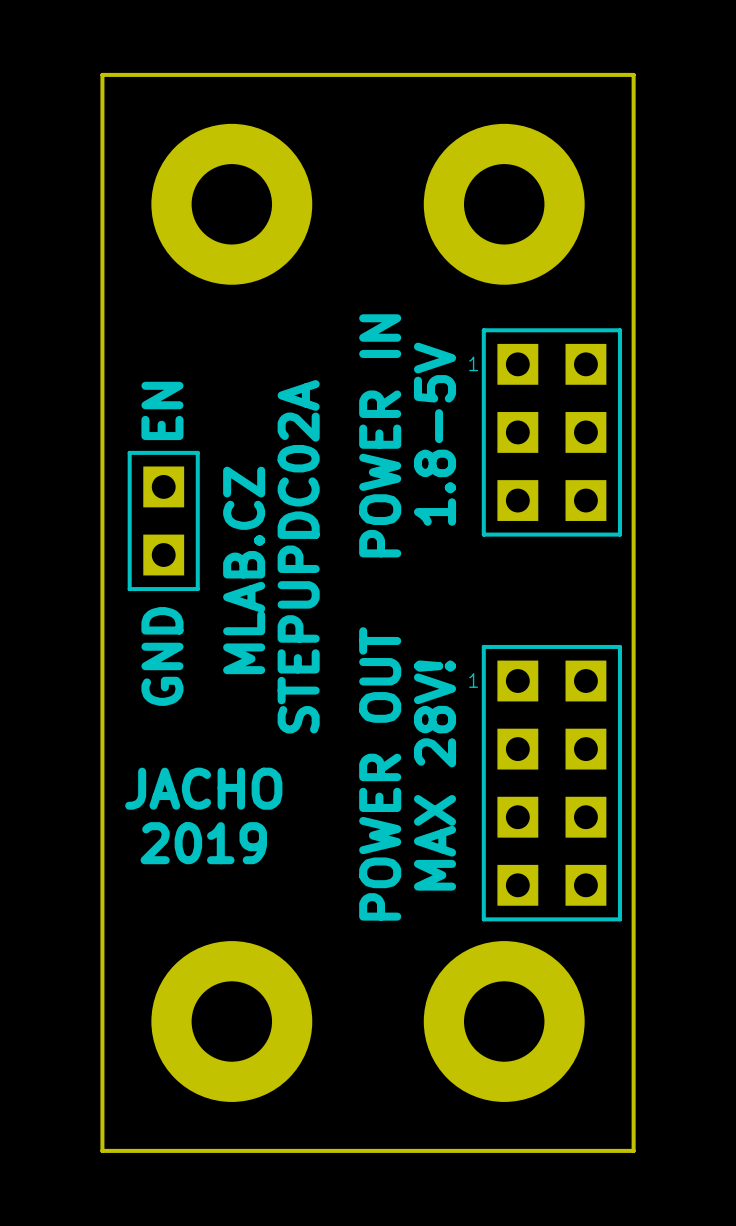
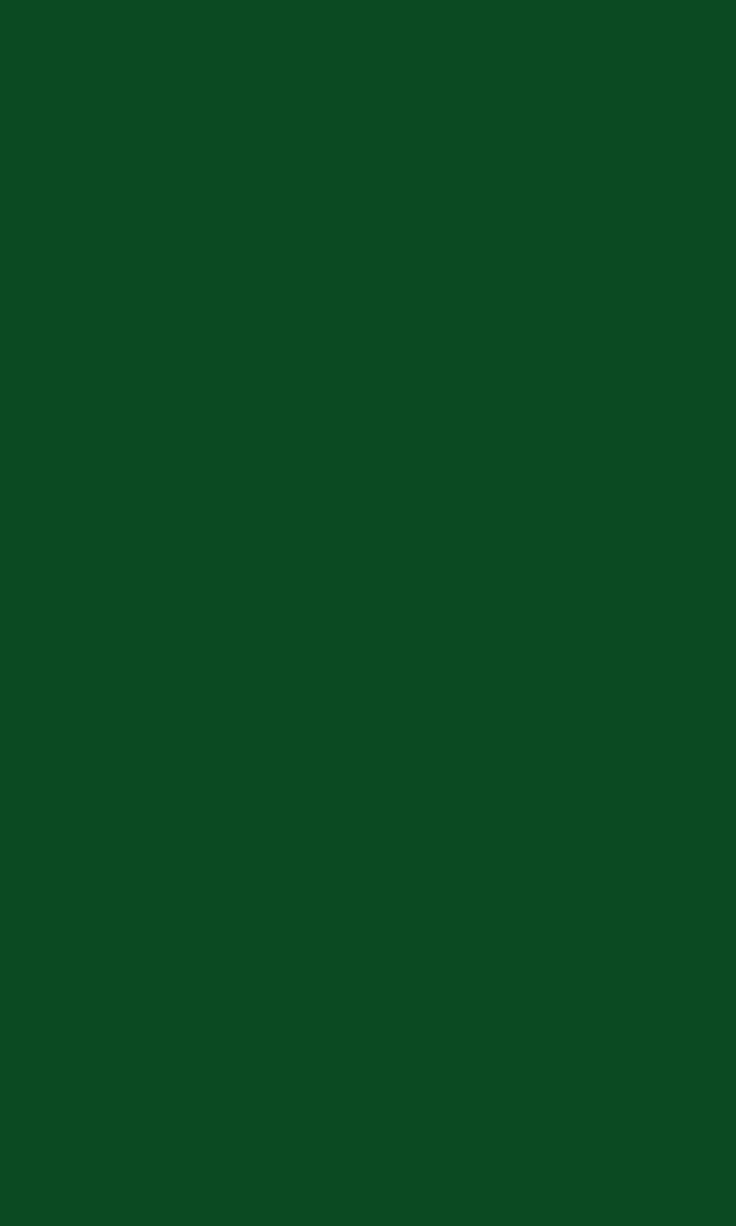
board edge: (102, 74) (102, 1150) (633, 1150) (633, 74) (102, 74) -> none
part: (231, 204) -> none
part: (504, 204) -> none
text: EN (162, 410) -> none
part: (551, 432) -> none
text: 1.8-5V (435, 434) -> none
text: POWER IN (380, 435) -> none
part: (163, 520) -> none
text: STEPUPDC02A (298, 556) -> none
text: MLAB.CZ (244, 570) -> none
text: GND (162, 656) -> none
text: POWER OUT (380, 773) -> none
text: MAX 28V! (435, 775) -> none
part: (551, 783) -> none
text: JACHO (203, 788) -> none
text: 2019 (203, 843) -> none
part: (231, 1021) -> none
part: (504, 1021) -> none

